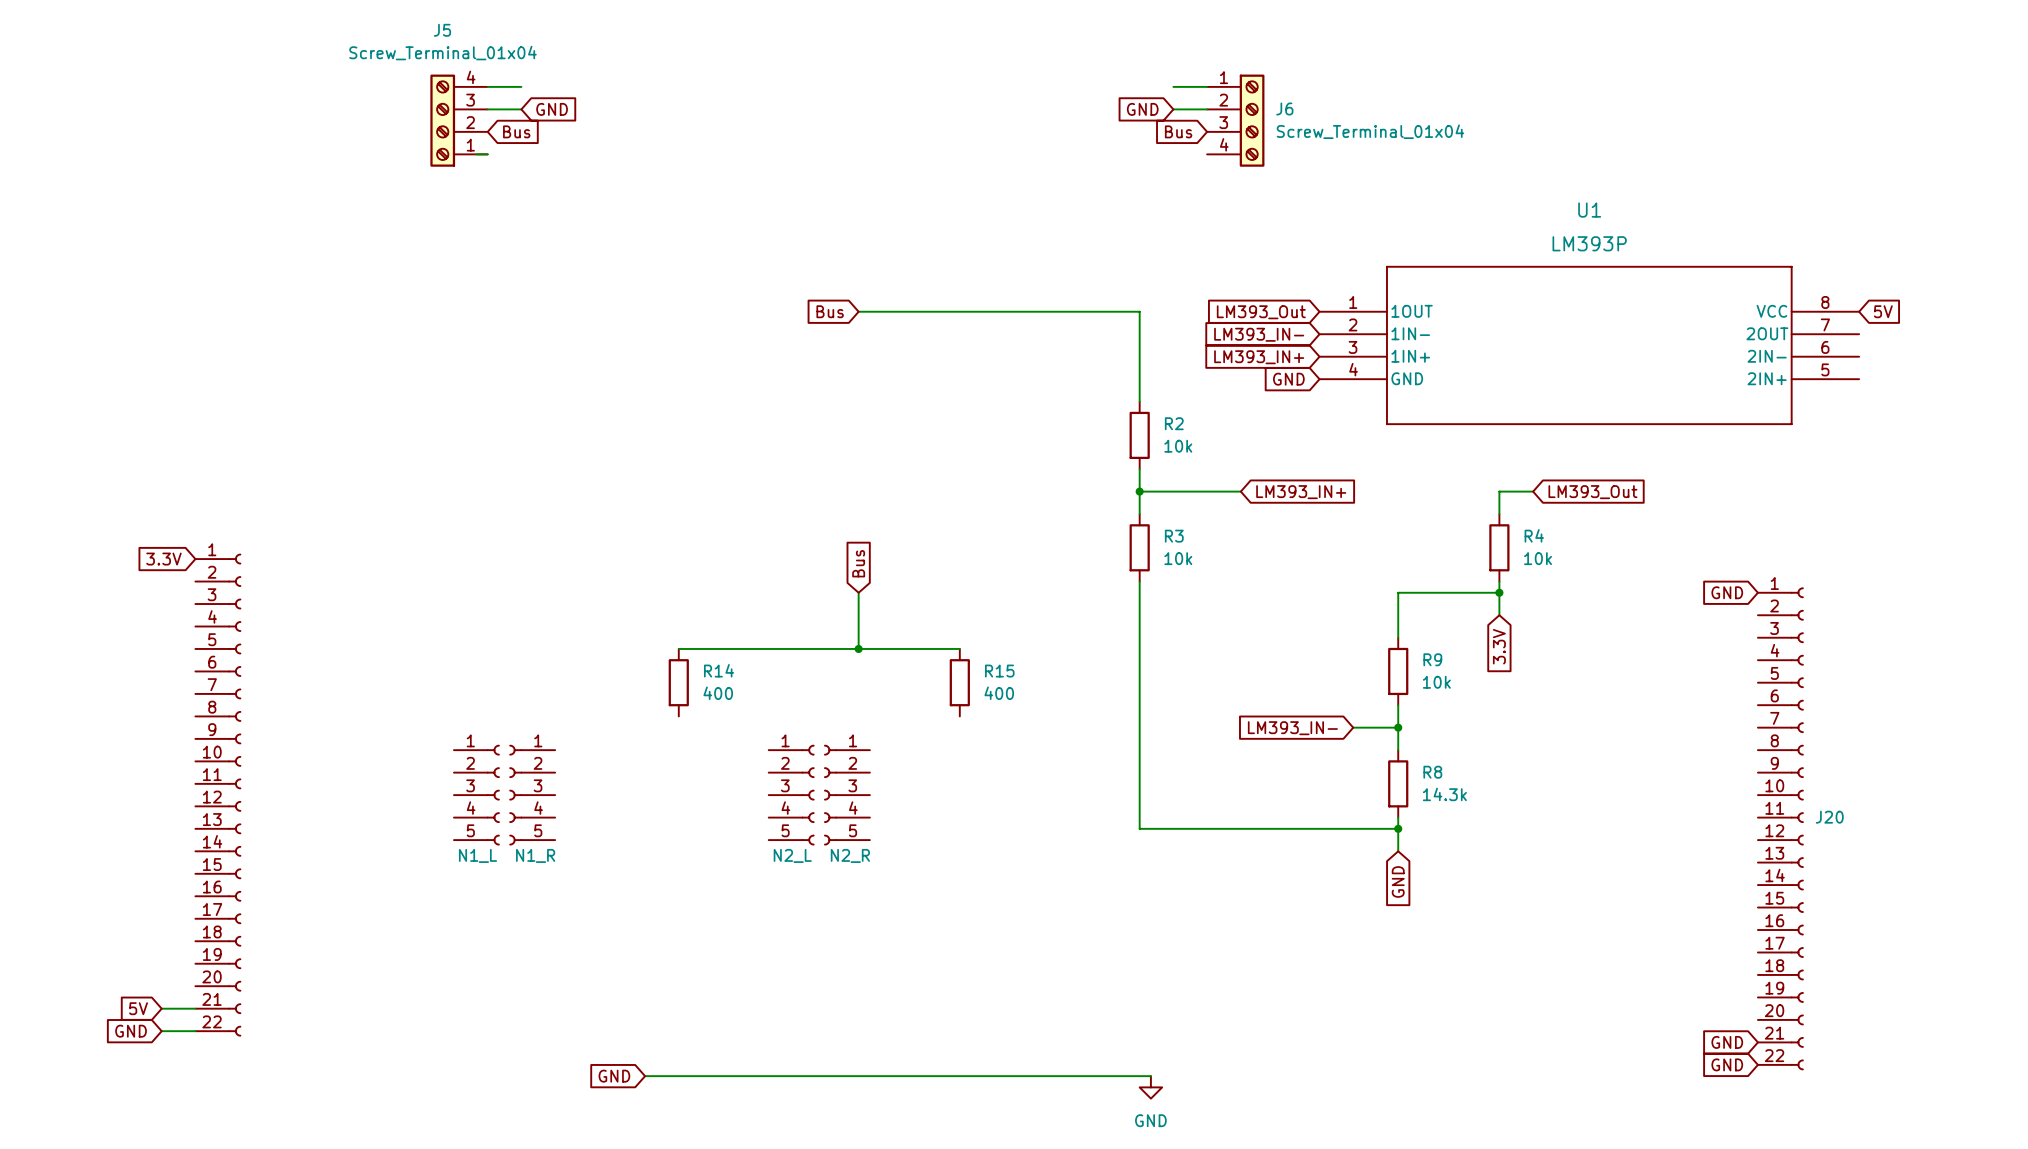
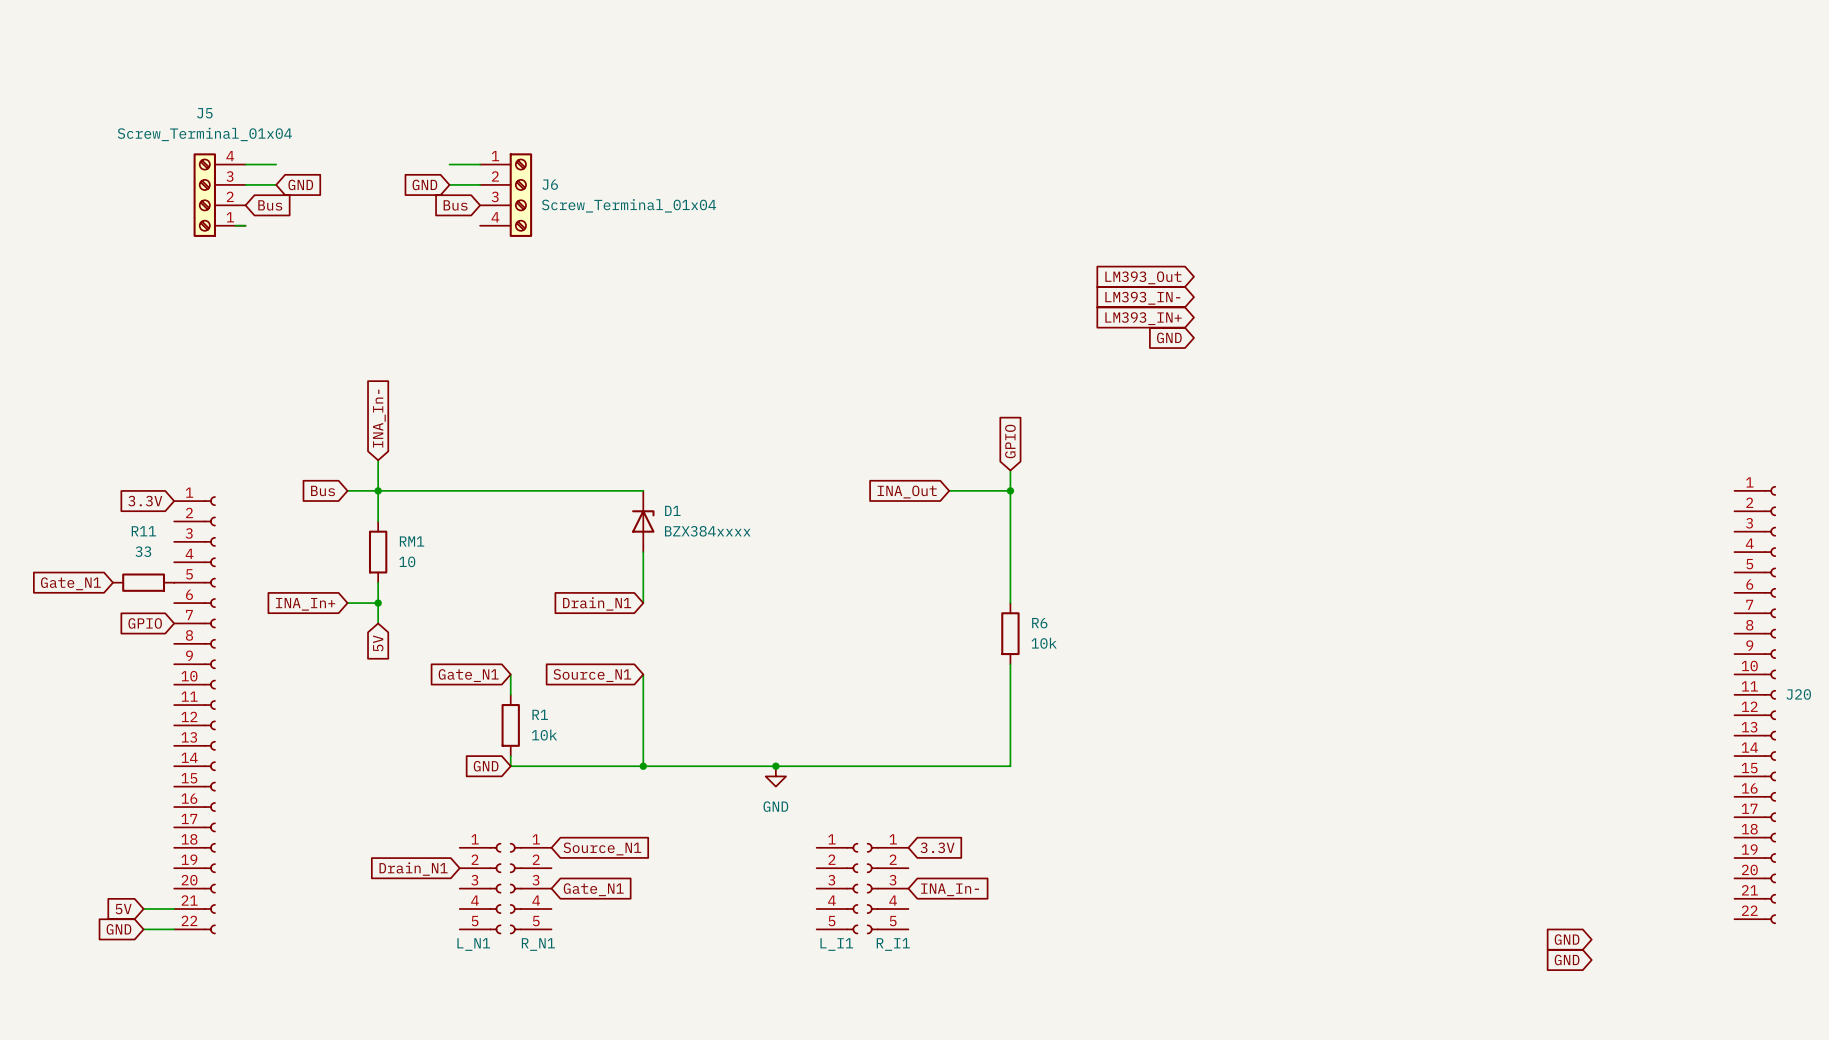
wire: (487, 86) (521, 86) -> (449, 164) (480, 164)
wire: (1173, 86) (1207, 86) -> none
wire: (487, 109) (521, 109) -> (449, 184) (480, 184)
global label rotation: 0° (552, 109) -> 180° (424, 184)
global label position: GND (552, 109) -> GND (424, 184)
global label: GND (1142, 109) -> none
wire: (1173, 109) (1207, 109) -> none
J5 position: (459, 120) -> (219, 195)
J6 position: (1235, 120) -> (506, 195)
global label rotation: 0° (516, 131) -> 180° (455, 205)
global label position: Bus (516, 131) -> Bus (455, 205)
global label: Bus (1178, 131) -> none
wire: (476, 154) (487, 154) -> none
wire: none -> (245, 164) (276, 164)
wire: none -> (245, 184) (276, 184)
global label: none -> GND (300, 184)
global label: none -> Bus (270, 205)
wire: none -> (235, 225) (245, 225)
global label: Bus (830, 311) -> none
wire: (858, 311) (1139, 311) (1139, 401) -> none
global label: 5V (1883, 311) -> none
U1: LM393P (1589, 345) -> none
R2: 10k (1139, 435) -> none
global label: none -> INA_In- (379, 418)
wire: (1139, 469) (1139, 514) -> none
global label: none -> GPIO (1010, 441)
wire: (1139, 491) (1240, 491) -> none
junction: (1139, 491) -> none
wire: (1533, 491) (1499, 491) (1499, 514) -> none
global label: LM393_IN+ (1301, 492) -> none
global label: LM393_Out (1592, 492) -> none
wire: none -> (378, 460) (378, 521)
wire: none -> (1010, 470) (1010, 603)
global label: none -> Bus (323, 490)
wire: none -> (347, 490) (643, 490)
junction: none -> (378, 490)
wire: none -> (949, 490) (1010, 490)
junction: none -> (1010, 490)
R3: 10k (1139, 547) -> none
R4: 10k (1499, 547) -> none
global label: none -> INA_Out (907, 492)
global label: Bus (858, 563) -> none
D1: none -> BZX384xxxx (643, 521)
wire: (1139, 581) (1139, 828) (1398, 828) -> none
wire: (1499, 581) (1499, 615) -> none
wire: (858, 592) (858, 648) -> (643, 552) (643, 603)
wire: (1499, 592) (1398, 592) (1398, 637) -> none
junction: (1499, 592) -> none
global label: GND (1727, 592) -> none
RM1: none -> 10 (378, 552)
global label: 3.3V (1499, 646) -> none
R11: none -> 33 (143, 582)
wire: none -> (378, 582) (378, 623)
wire: (678, 648) (959, 648) -> none
junction: (858, 648) -> none
global label: none -> Gate_N1 (70, 583)
global label: none -> INA_In+ (305, 604)
wire: none -> (347, 603) (378, 603)
junction: none -> (378, 603)
global label: none -> Drain_N1 (597, 603)
R9: 10k (1398, 671) -> none
R14: 400 (678, 682) -> none
R15: 400 (959, 682) -> none
global label: none -> GPIO (145, 623)
R6: none -> 10k (1010, 633)
wire: (1398, 705) (1398, 750) -> none
global label: none -> 5V (378, 643)
wire: (1353, 727) (1398, 727) -> none
junction: (1398, 727) -> none
global label: LM393_IN- (1292, 728) -> none
wire: none -> (1010, 664) (1010, 766) (510, 766) (510, 756)
global label: none -> Gate_N1 (468, 675)
wire: none -> (510, 674) (510, 694)
global label: none -> Source_N1 (592, 675)
wire: none -> (643, 674) (643, 766)
R8: 14.3k (1398, 783) -> none
N1_L: (476, 795) -> none
N1_R: (532, 795) -> none
N2_L: (791, 795) -> none
N2_R: (847, 795) -> none
R1: none -> 10k (510, 725)
wire: (1398, 817) (1398, 851) -> none
junction: (1398, 828) -> none
J20 position: (1780, 828) -> (1755, 705)
global label: none -> GND (486, 766)
junction: none -> (643, 766)
junction: none -> (775, 766)
power symbol: none -> GND (775, 776)
global label: GND (1398, 881) -> none
global label: none -> Source_N1 (602, 848)
global label: none -> 3.3V (937, 847)
global label: none -> Drain_N1 (413, 869)
L_N1: none -> (480, 888)
R_N1: none -> (530, 888)
global label: none -> Gate_N1 (593, 889)
L_I1: none -> (837, 888)
R_I1: none -> (887, 888)
global label: none -> INA_In- (950, 889)
global label: GND (614, 1076) -> none
wire: (645, 1076) (1150, 1076) -> none
power symbol: GND (1150, 1087) -> none

